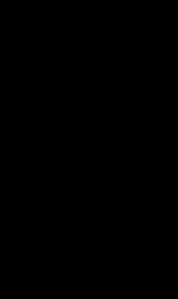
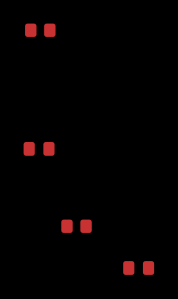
part: none -> (40, 30)
part: none -> (39, 148)
part: none -> (76, 226)
part: none -> (138, 268)

